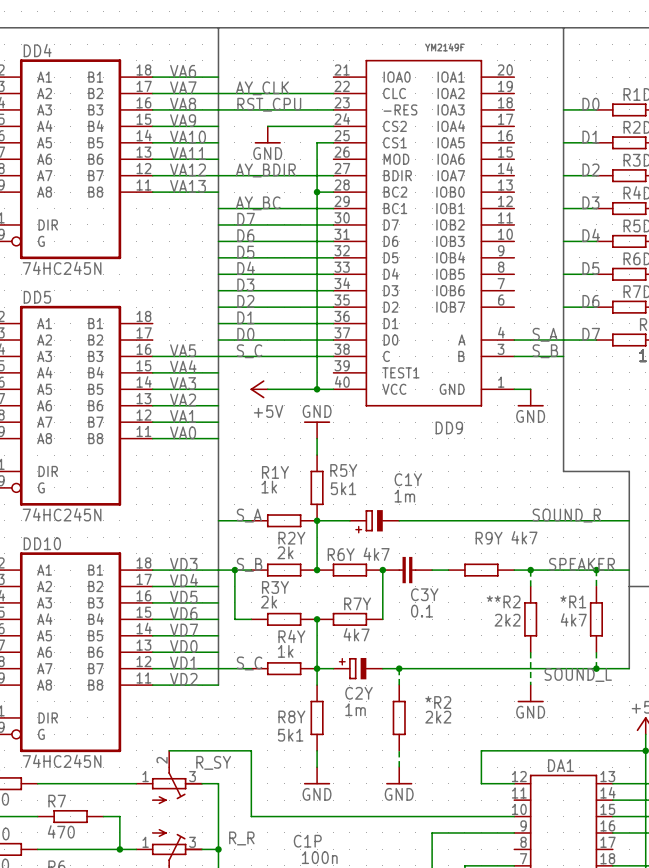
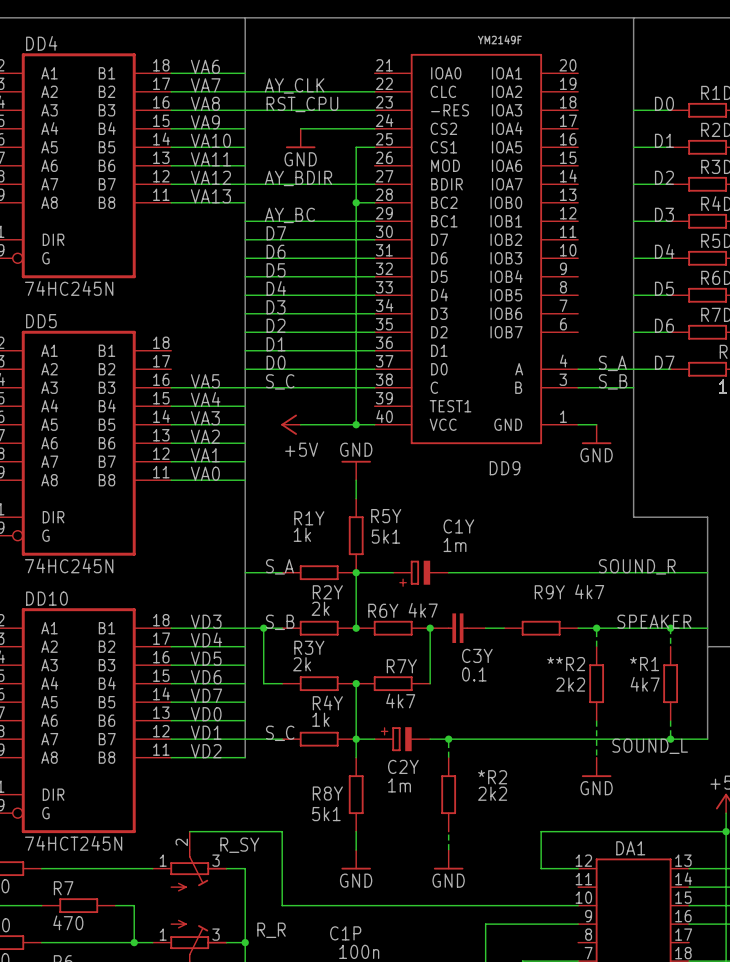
DD10 value: 74HC245N (62, 761) -> 74HCT245N (73, 843)

